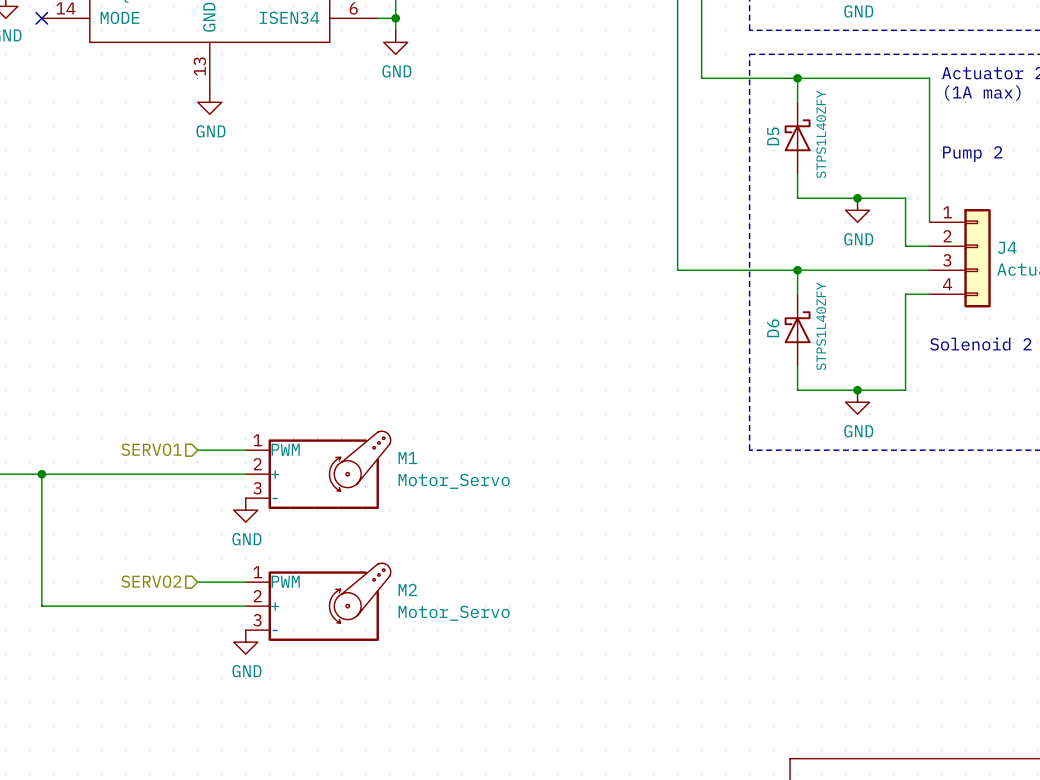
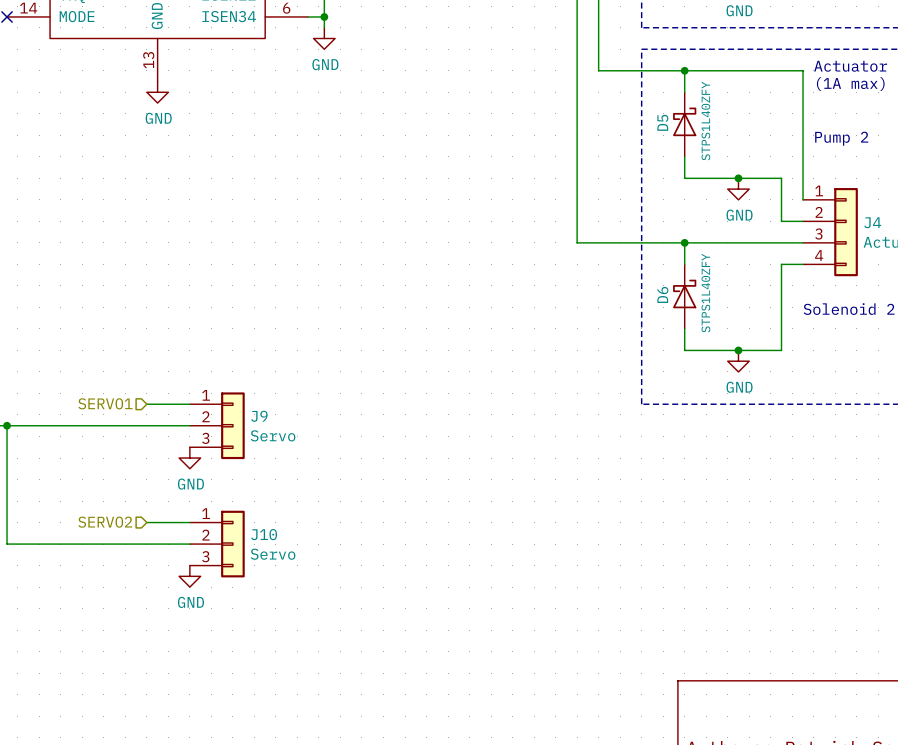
M1: Motor_Servo (318, 470) -> none
J9: none -> Servo (217, 425)
M2: Motor_Servo (318, 602) -> none
J10: none -> Servo (217, 544)

